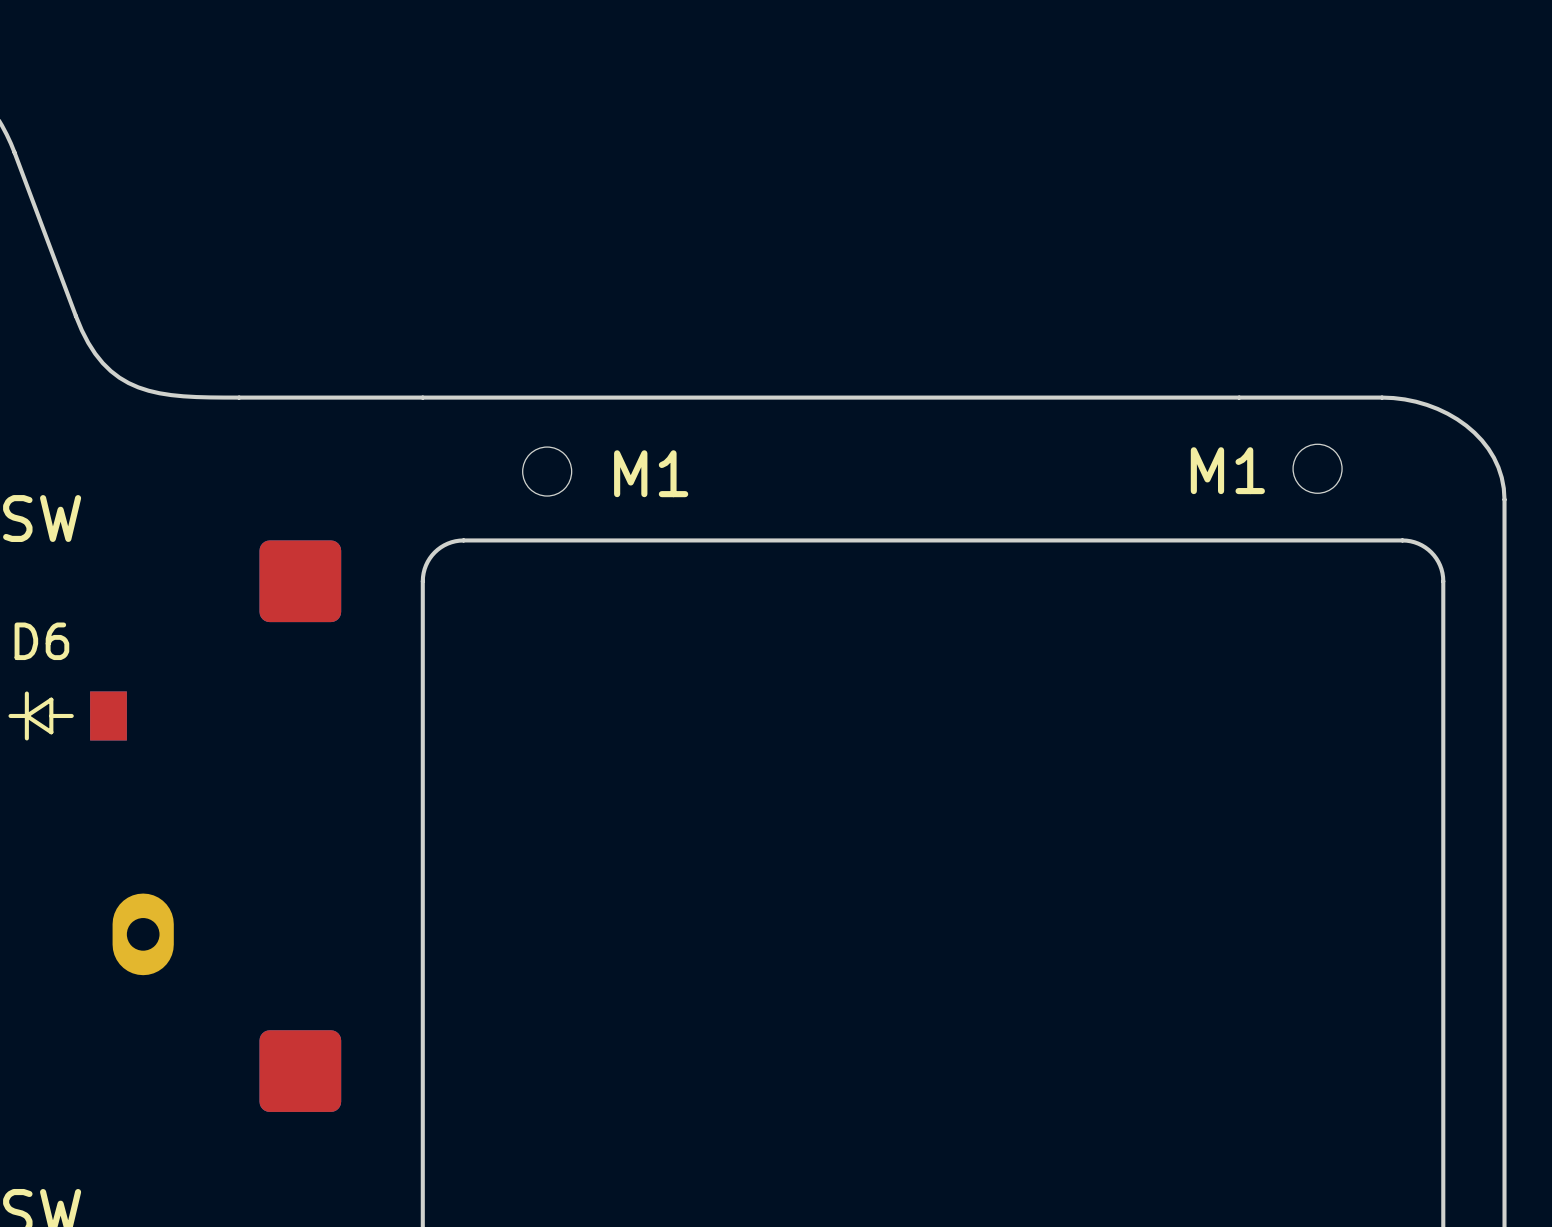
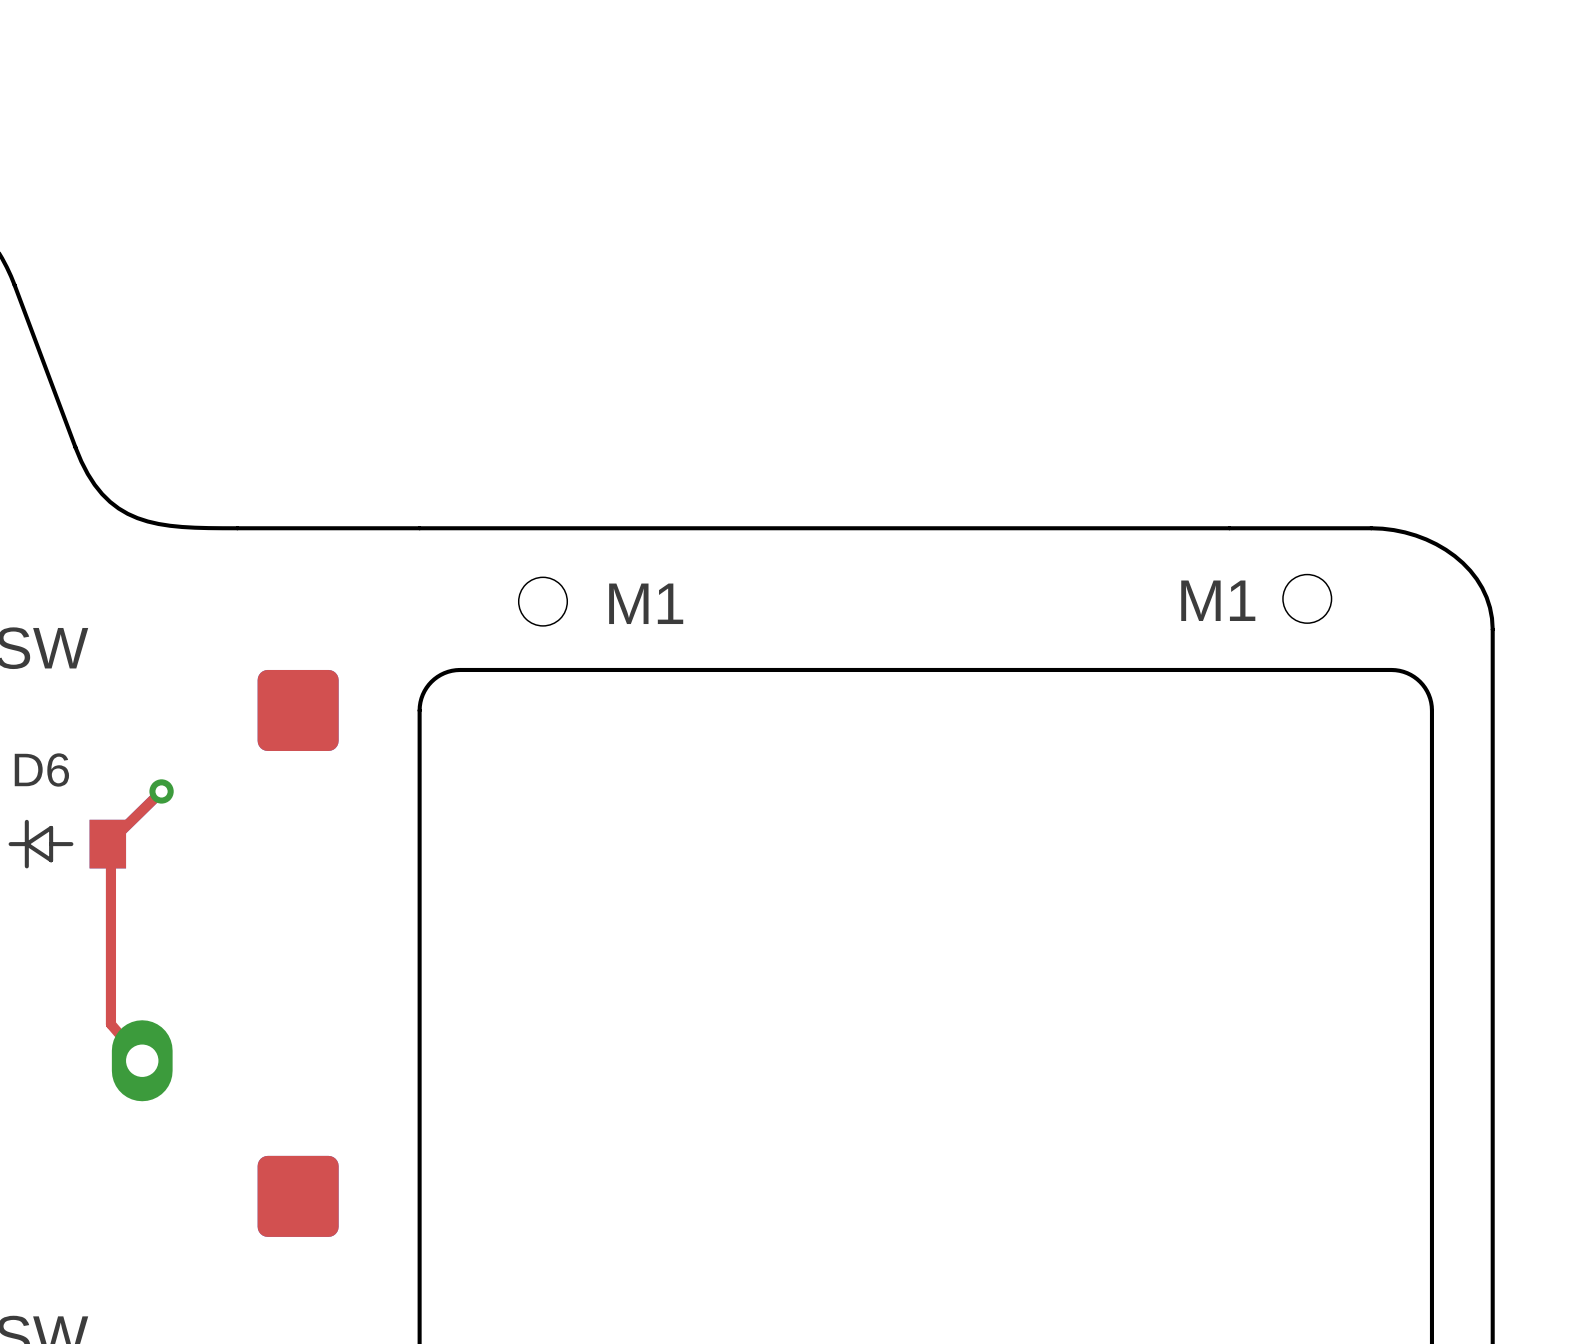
top track: none -> (161, 791) (107, 844) (110, 862) (110, 1024) (142, 1060)
via: none -> (161, 791)

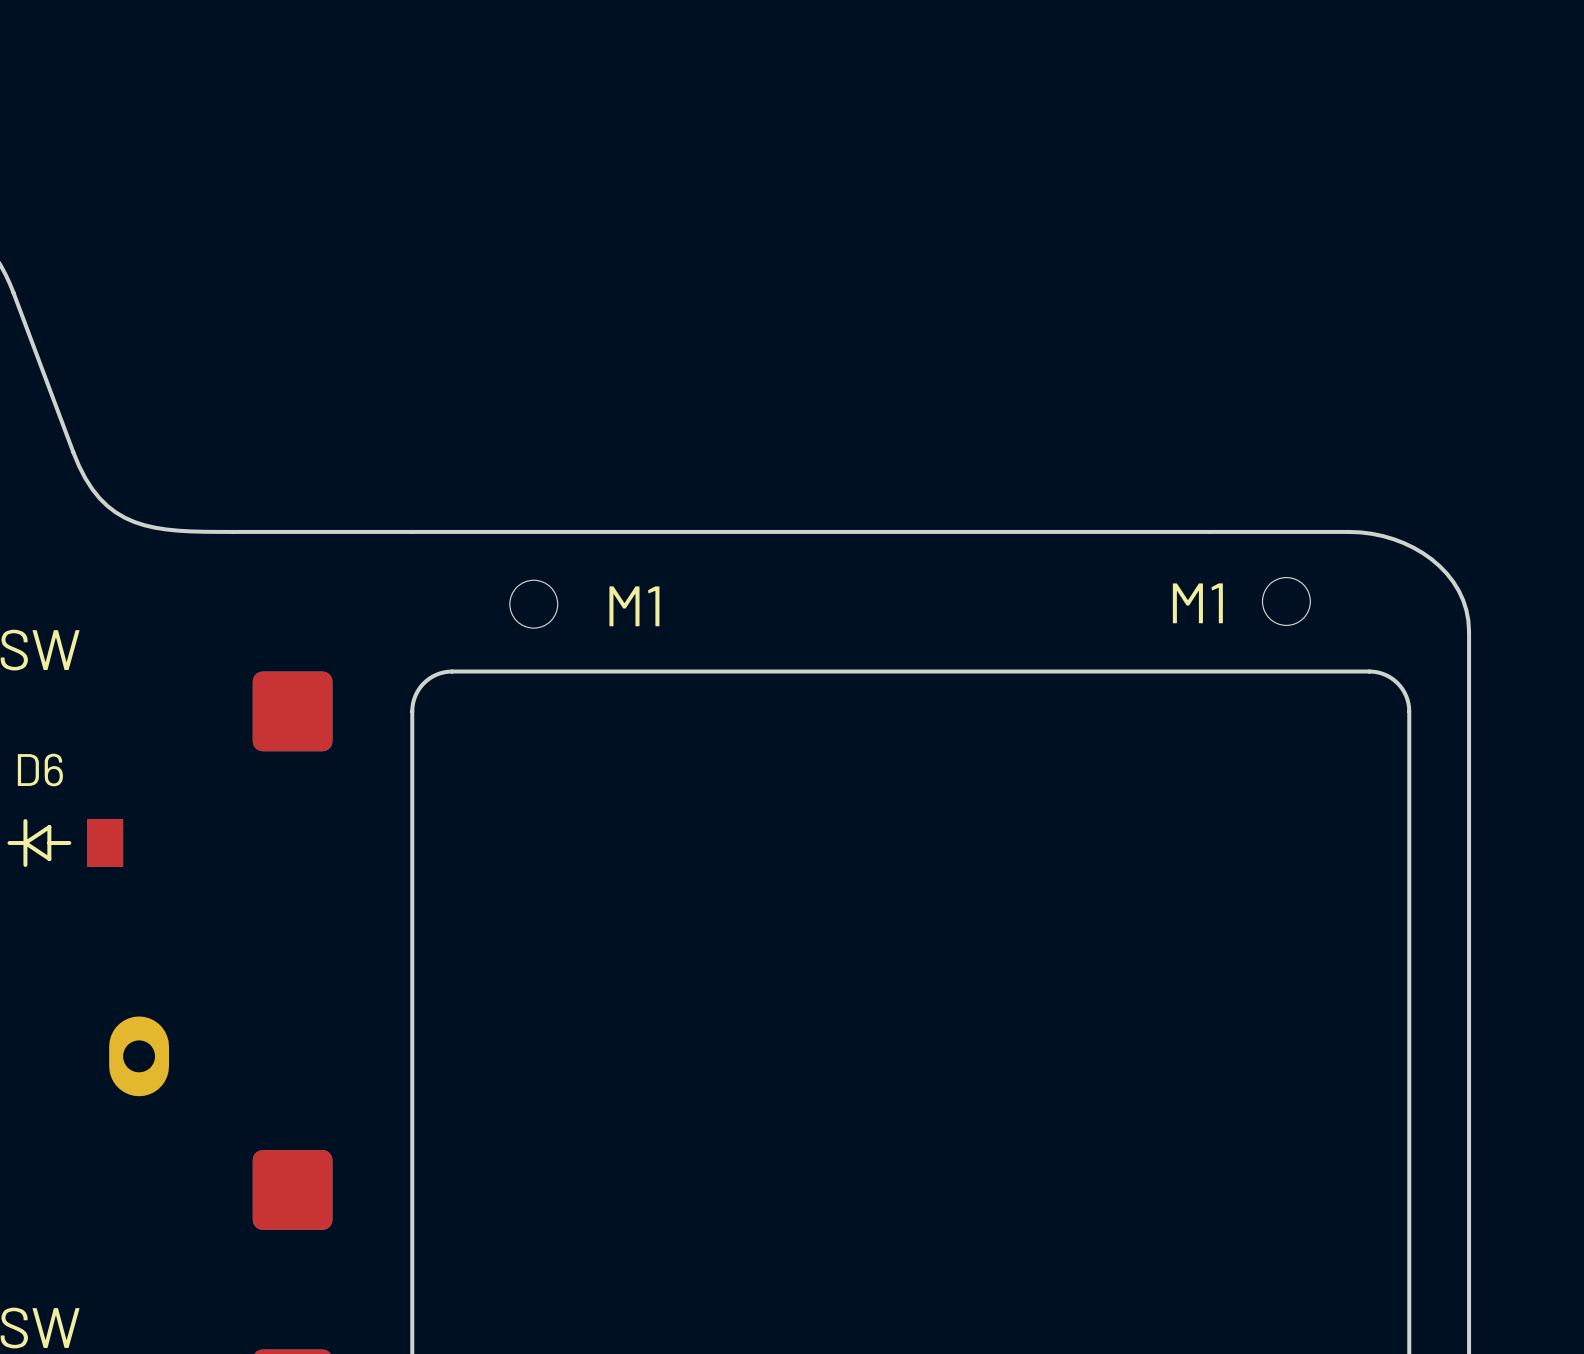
top track: (161, 791) (107, 844) (110, 862) (110, 1024) (142, 1060) -> none
via: (161, 791) -> none

